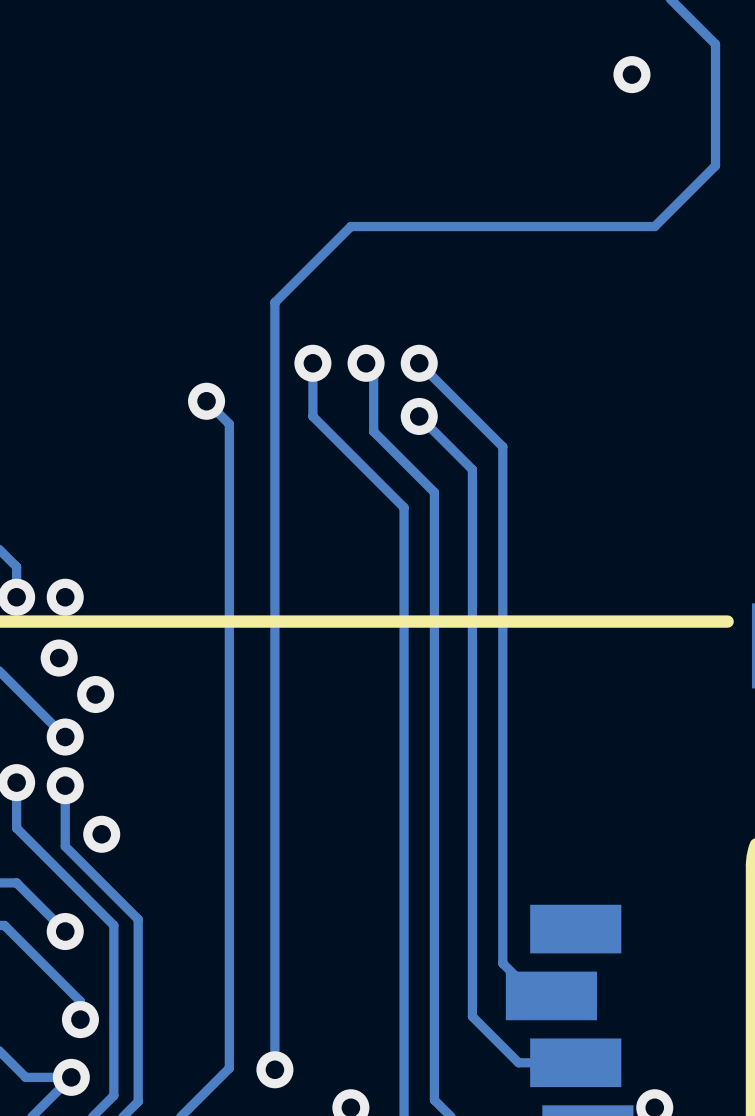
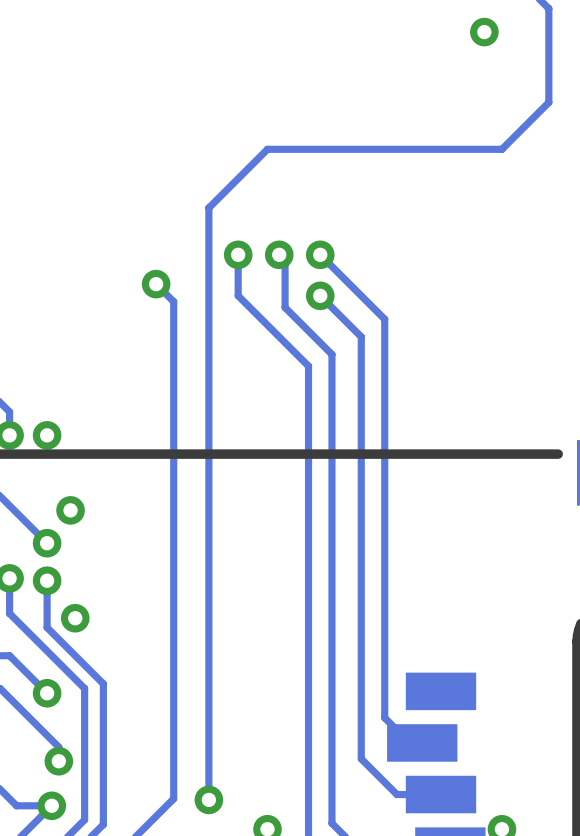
via: (59, 658) -> none

